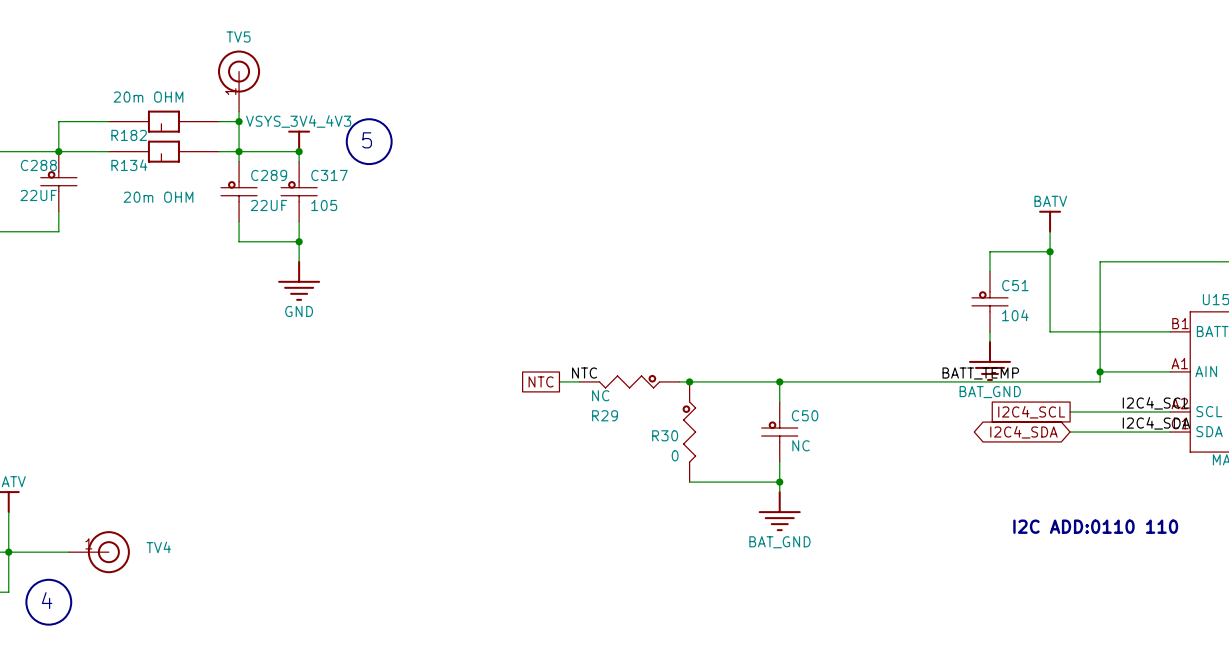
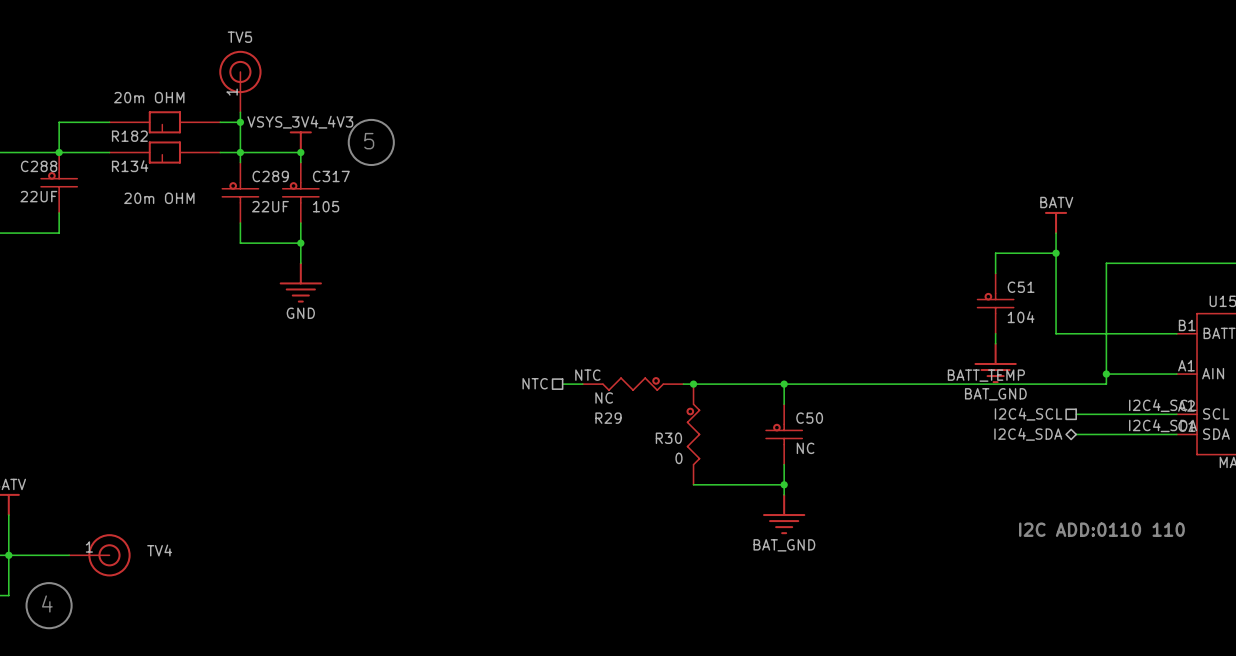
hierarchical label: none -> NTC (535, 383)
global label: NTC (541, 381) -> none
hierarchical label: none -> I2C4_SCL (1028, 414)
global label: I2C4_SCL (1031, 412) -> none
hierarchical label: none -> I2C4_SDA (1028, 434)
global label: I2C4_SDA (1023, 432) -> none

